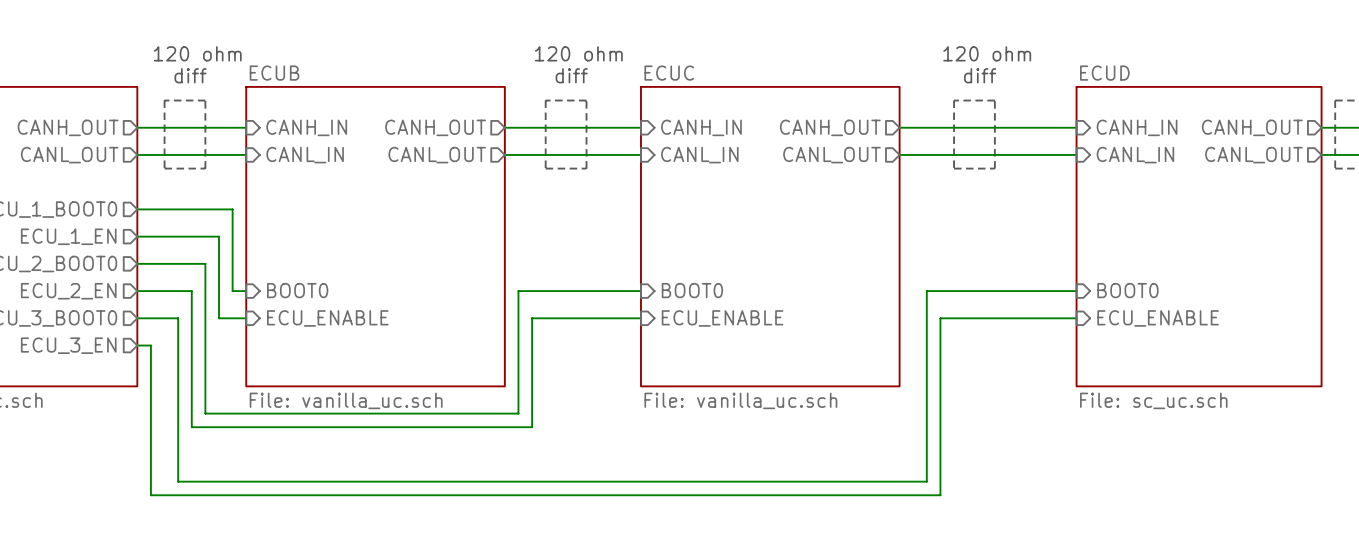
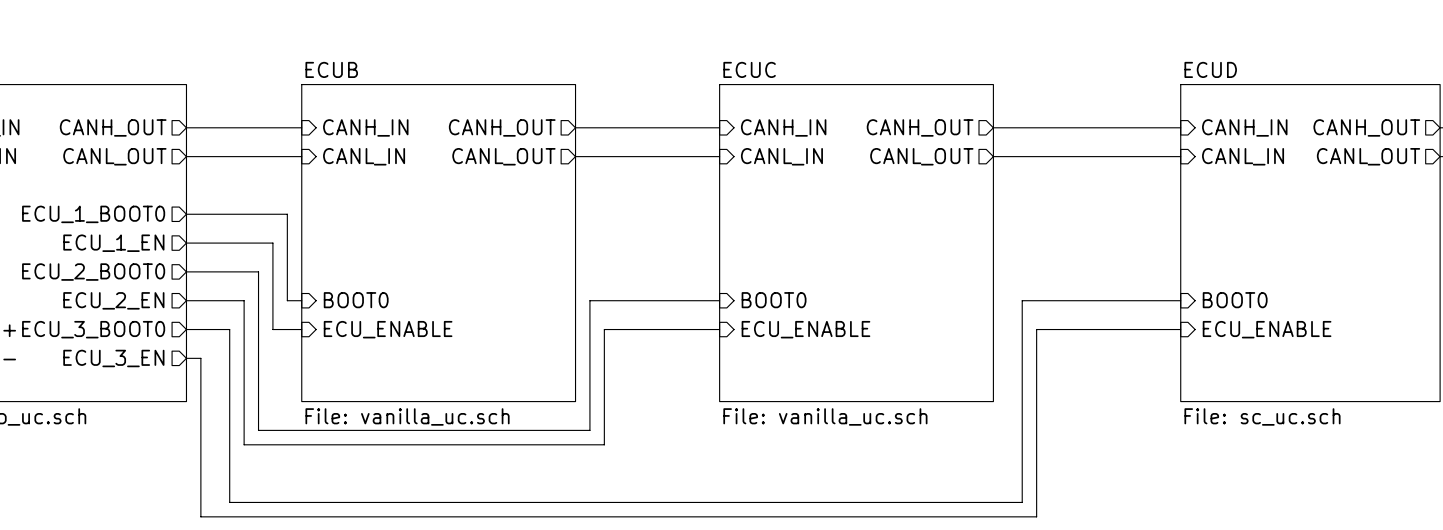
text: 120 ohm (197, 53) -> none
text: 120 ohm (578, 53) -> none
text: 120 ohm (987, 53) -> none
text: diff (190, 75) -> none
text: diff (571, 75) -> none
text: diff (980, 75) -> none
line: (164, 100) (205, 100) (205, 168) (164, 168) (164, 100) -> none
line: (545, 100) (586, 100) (586, 168) (545, 168) (545, 100) -> none
line: (954, 100) (994, 100) (994, 168) (954, 168) (954, 100) -> none

